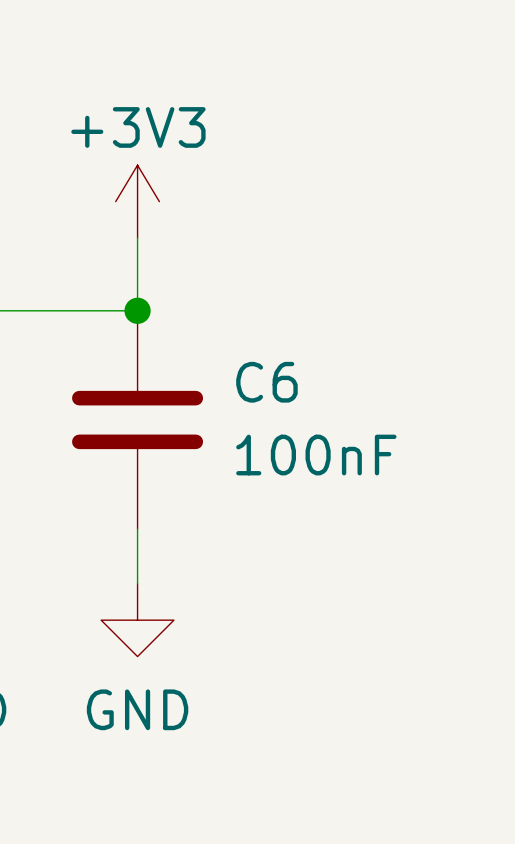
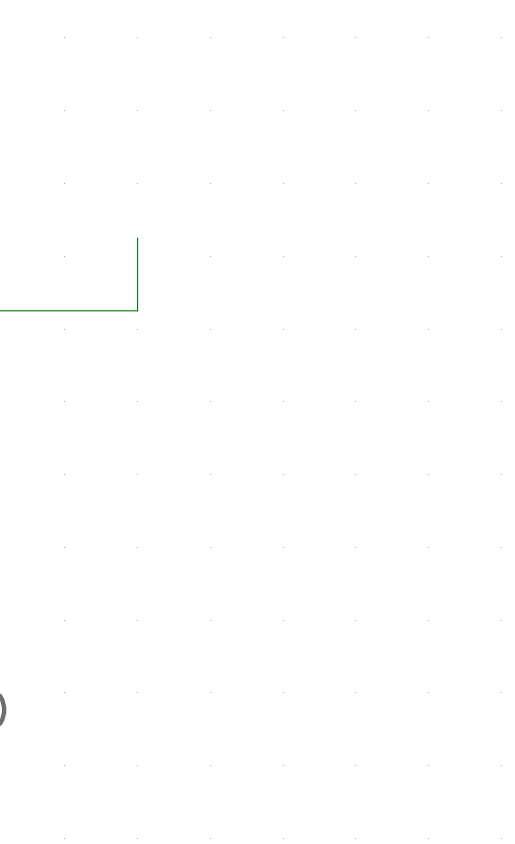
power symbol: +3V3 (137, 201) -> none
junction: (137, 310) -> none
C6: 100nF (137, 419) -> none
wire: (137, 529) (137, 583) -> none
power symbol: GND (137, 620) -> none

